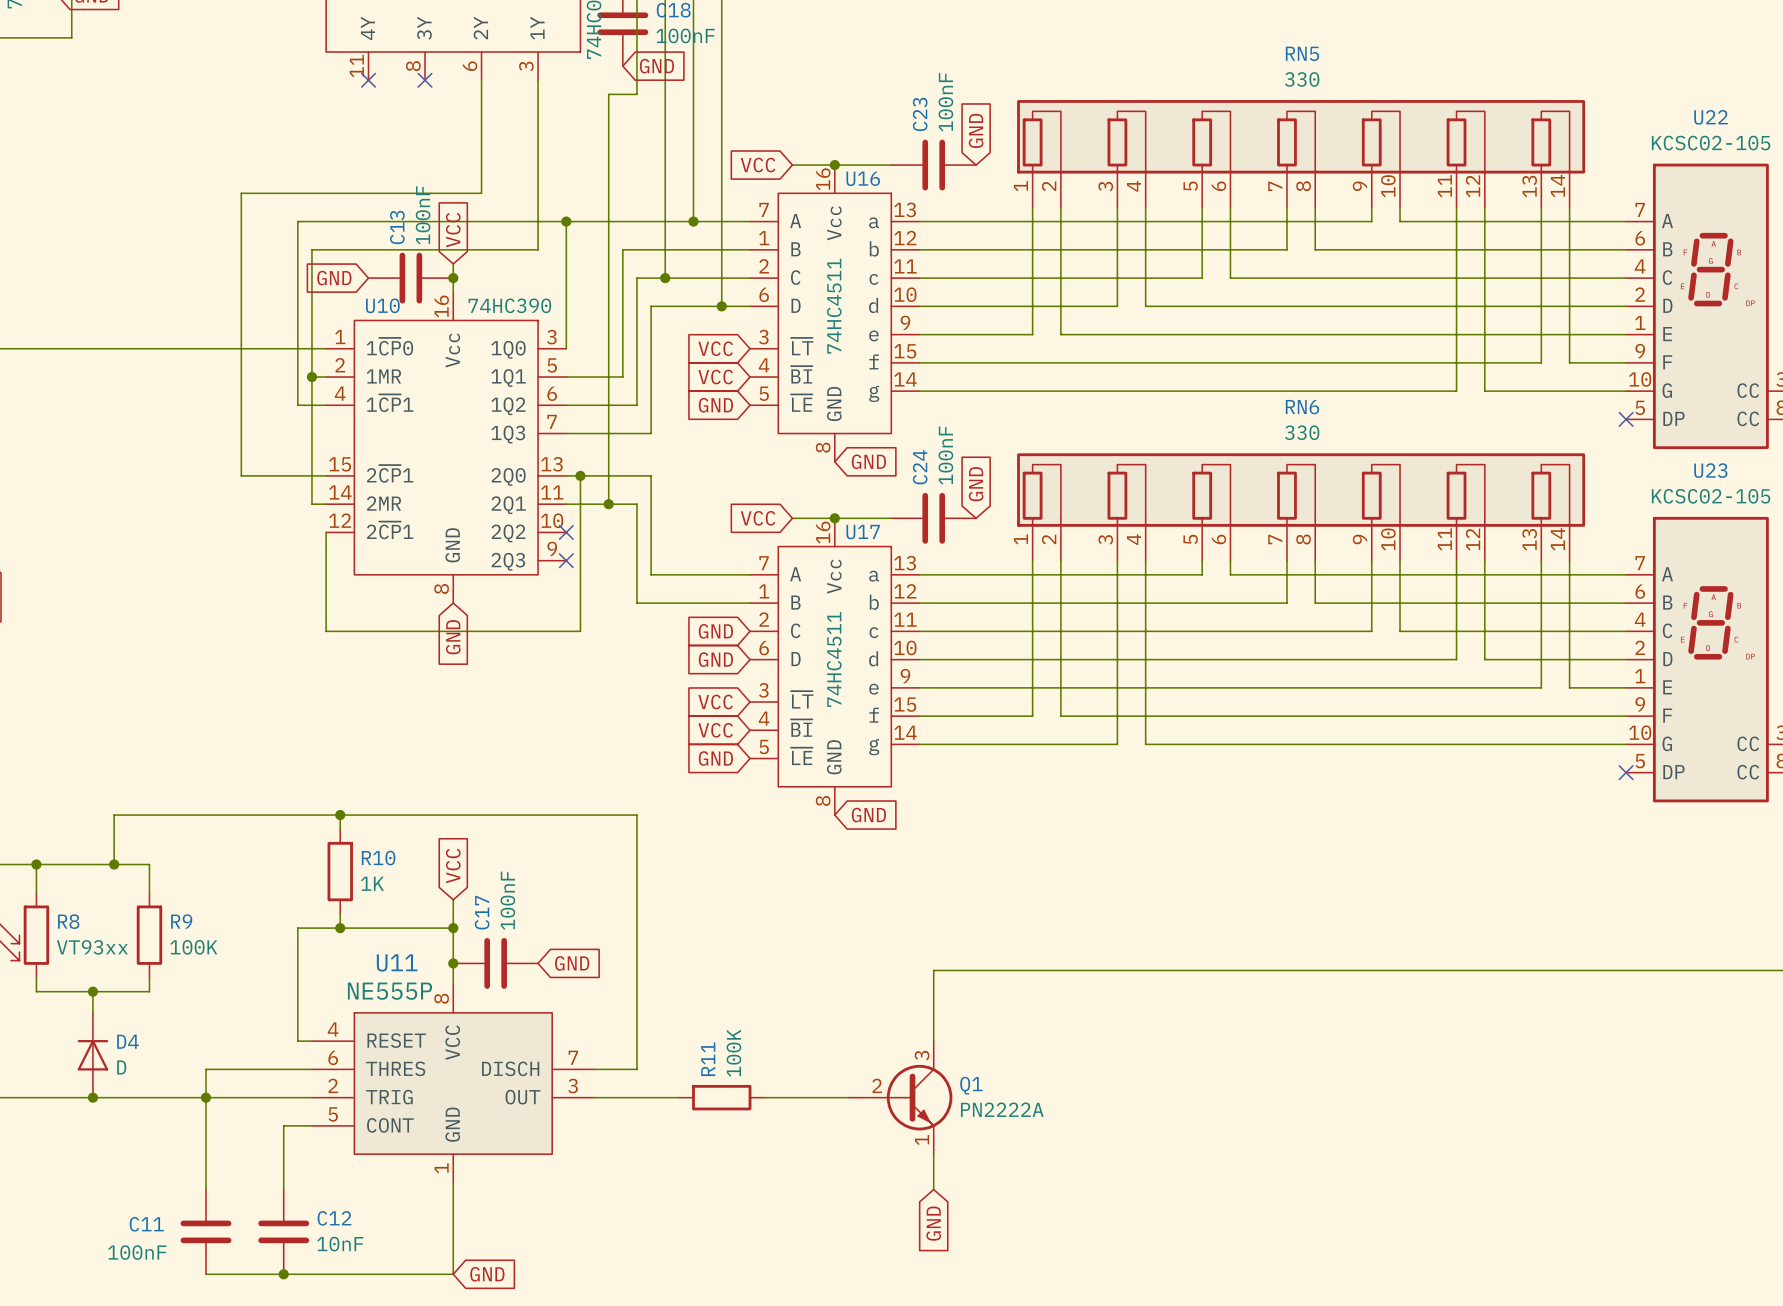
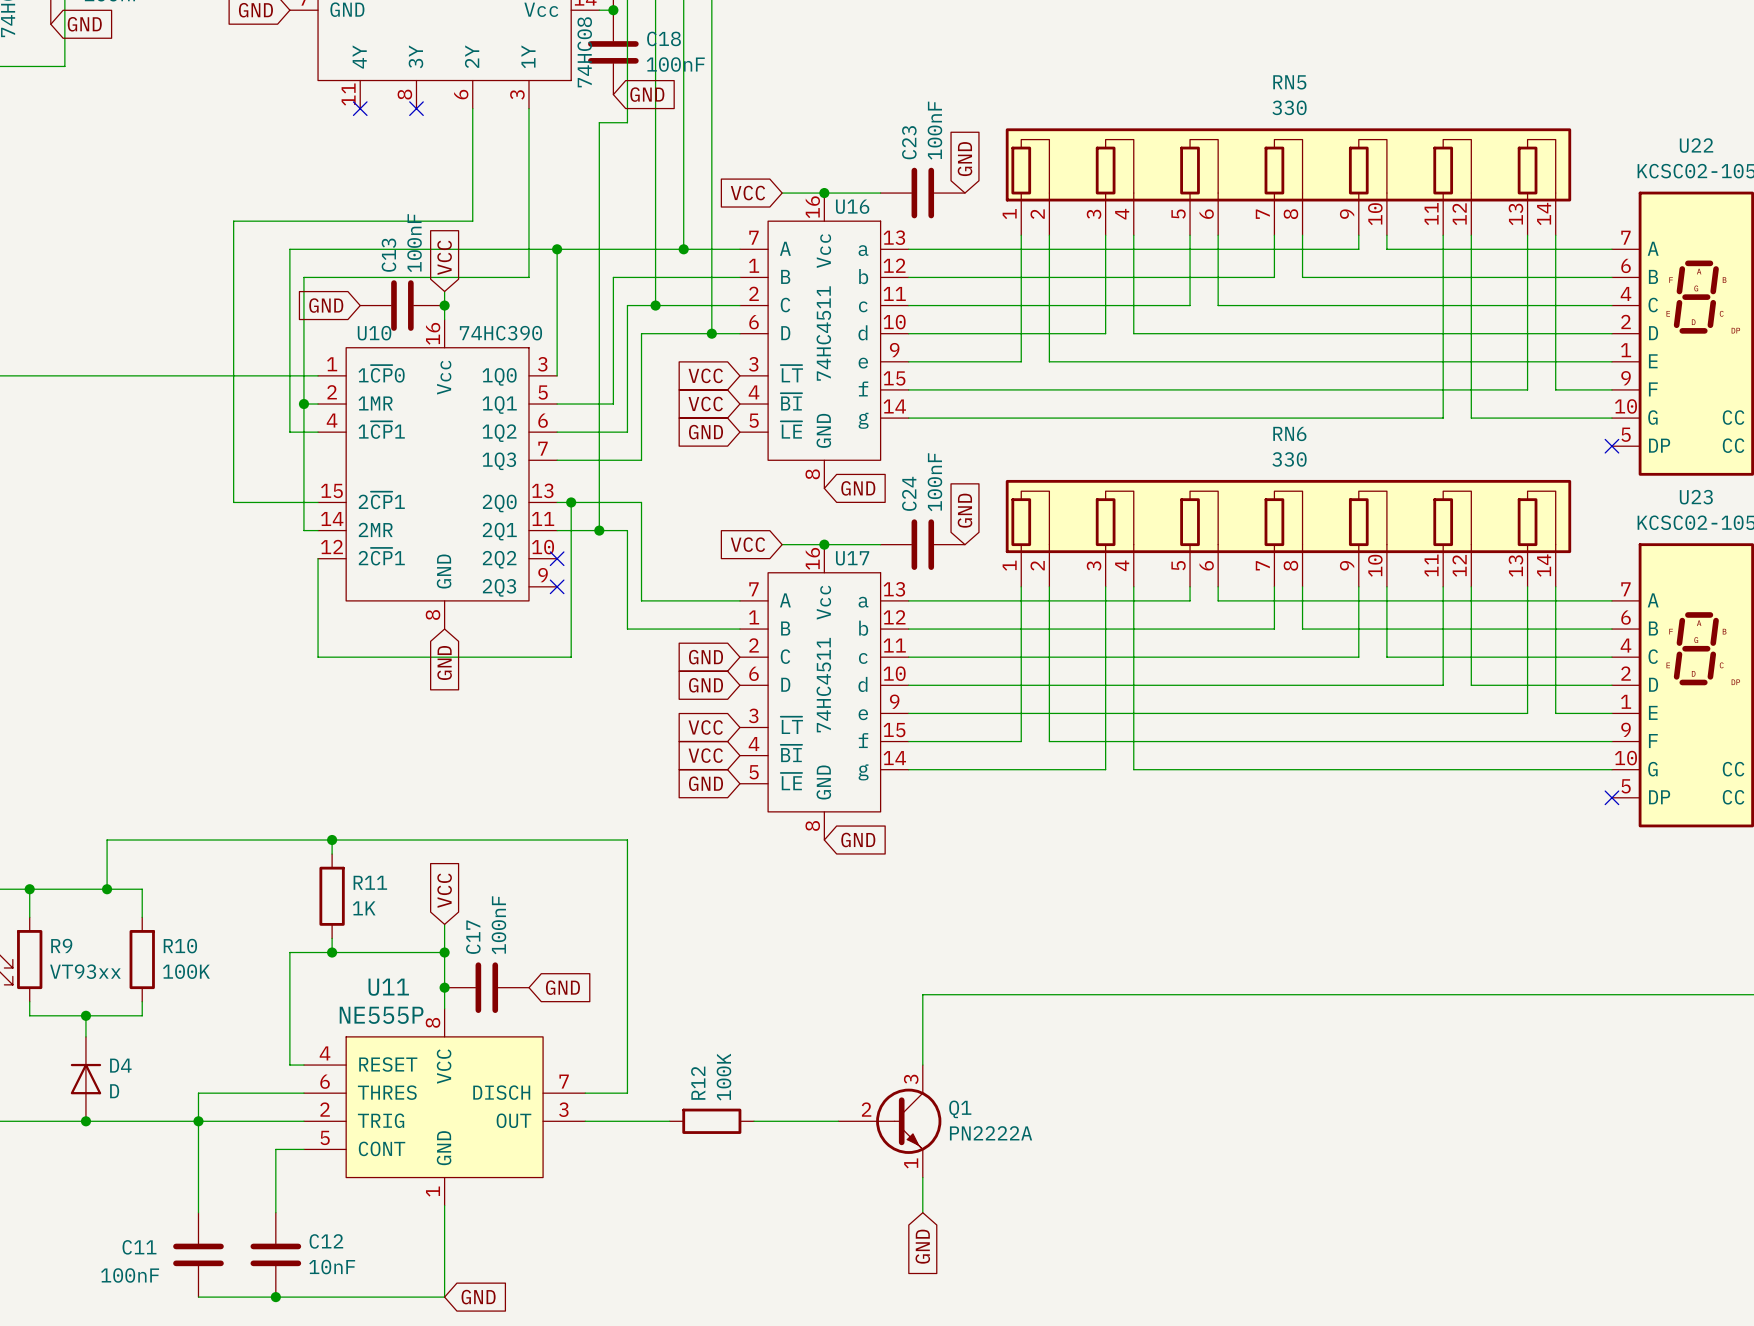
R10 name: R10 (378, 858) -> R11 (370, 882)
R8 name: R8 (68, 921) -> R9 (61, 945)
R9 name: R9 (181, 921) -> R10 (180, 946)
R11 name: R11 (708, 1059) -> R12 (698, 1083)

